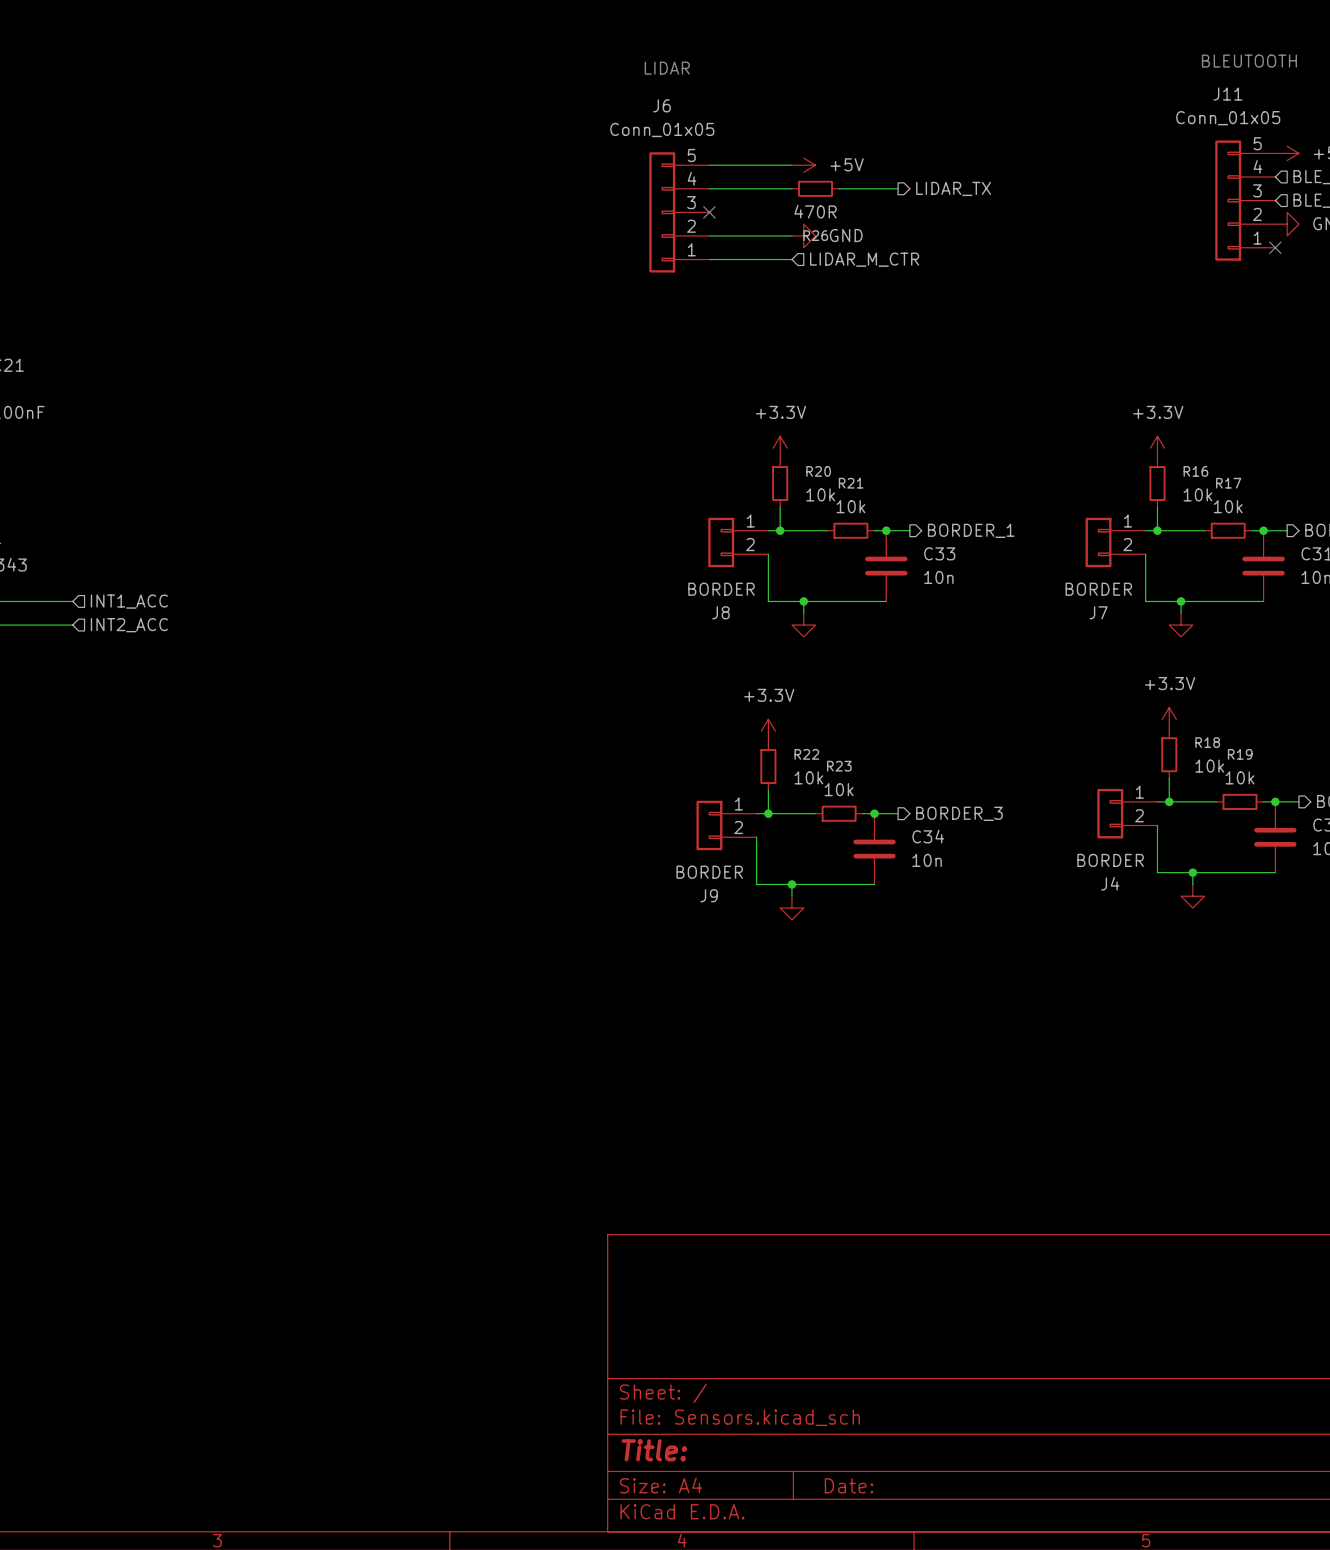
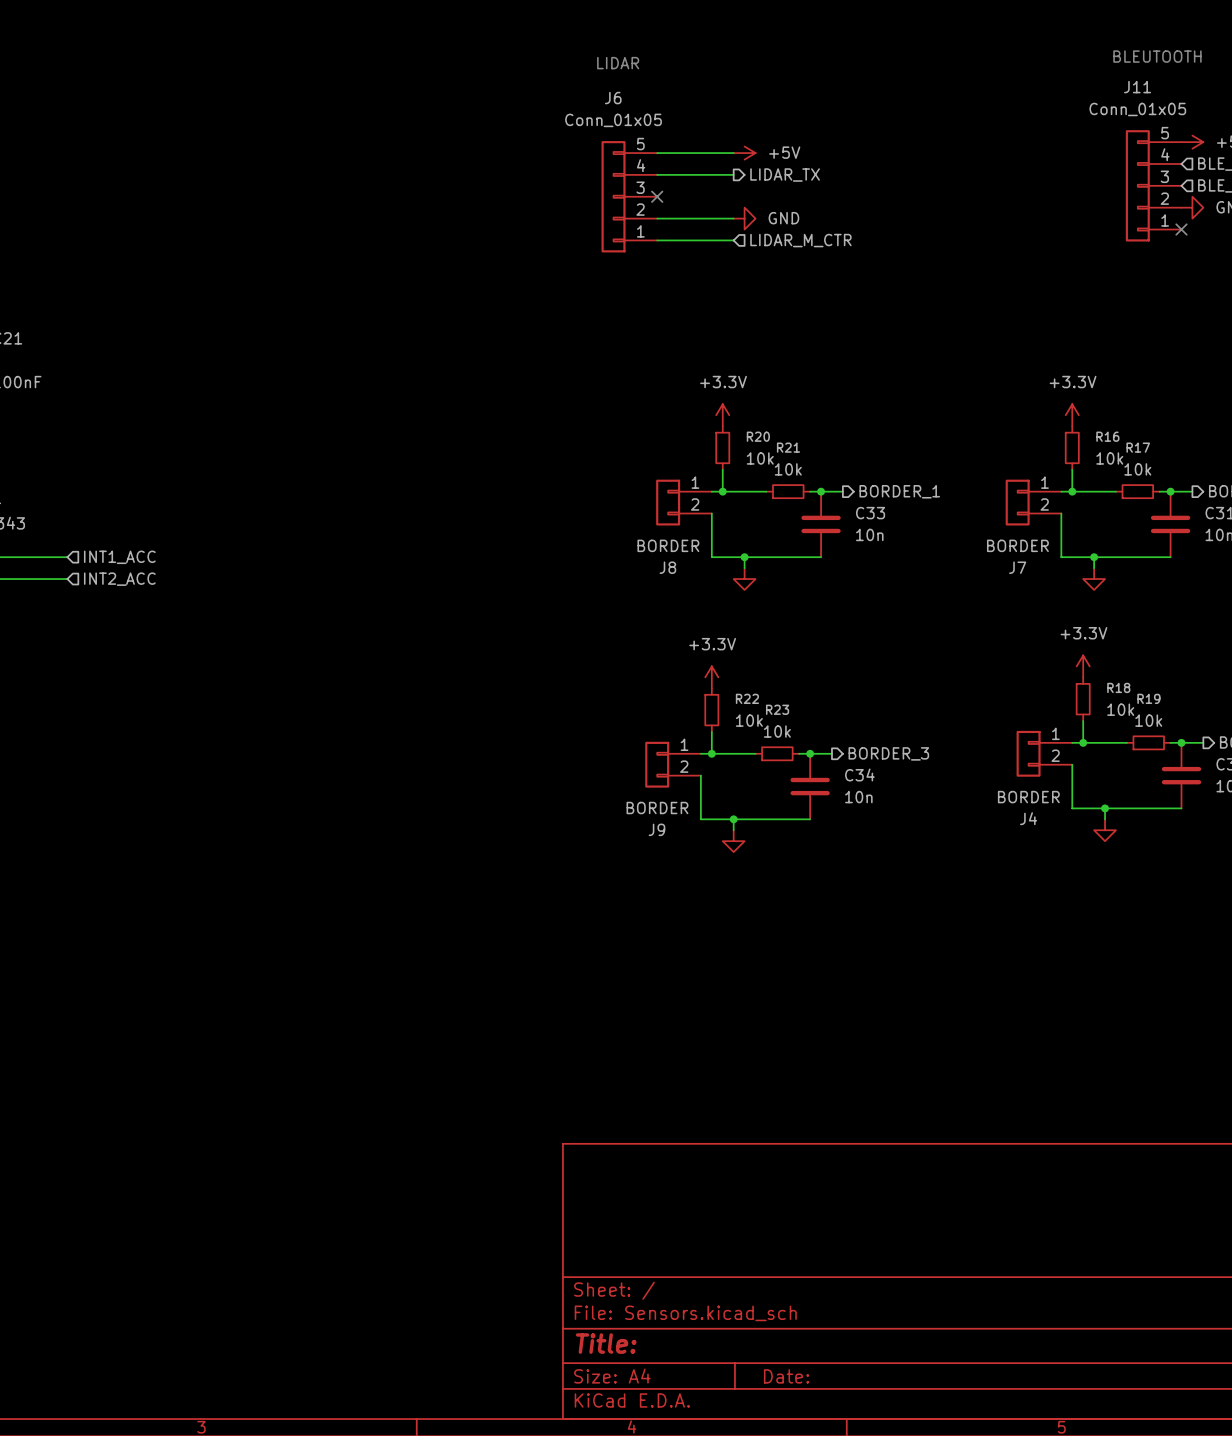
R26: 470R (815, 188) -> none
wire: (839, 188) (898, 188) -> none
hierarchical label position: LIDAR_TX (953, 188) -> LIDAR_TX (785, 175)

